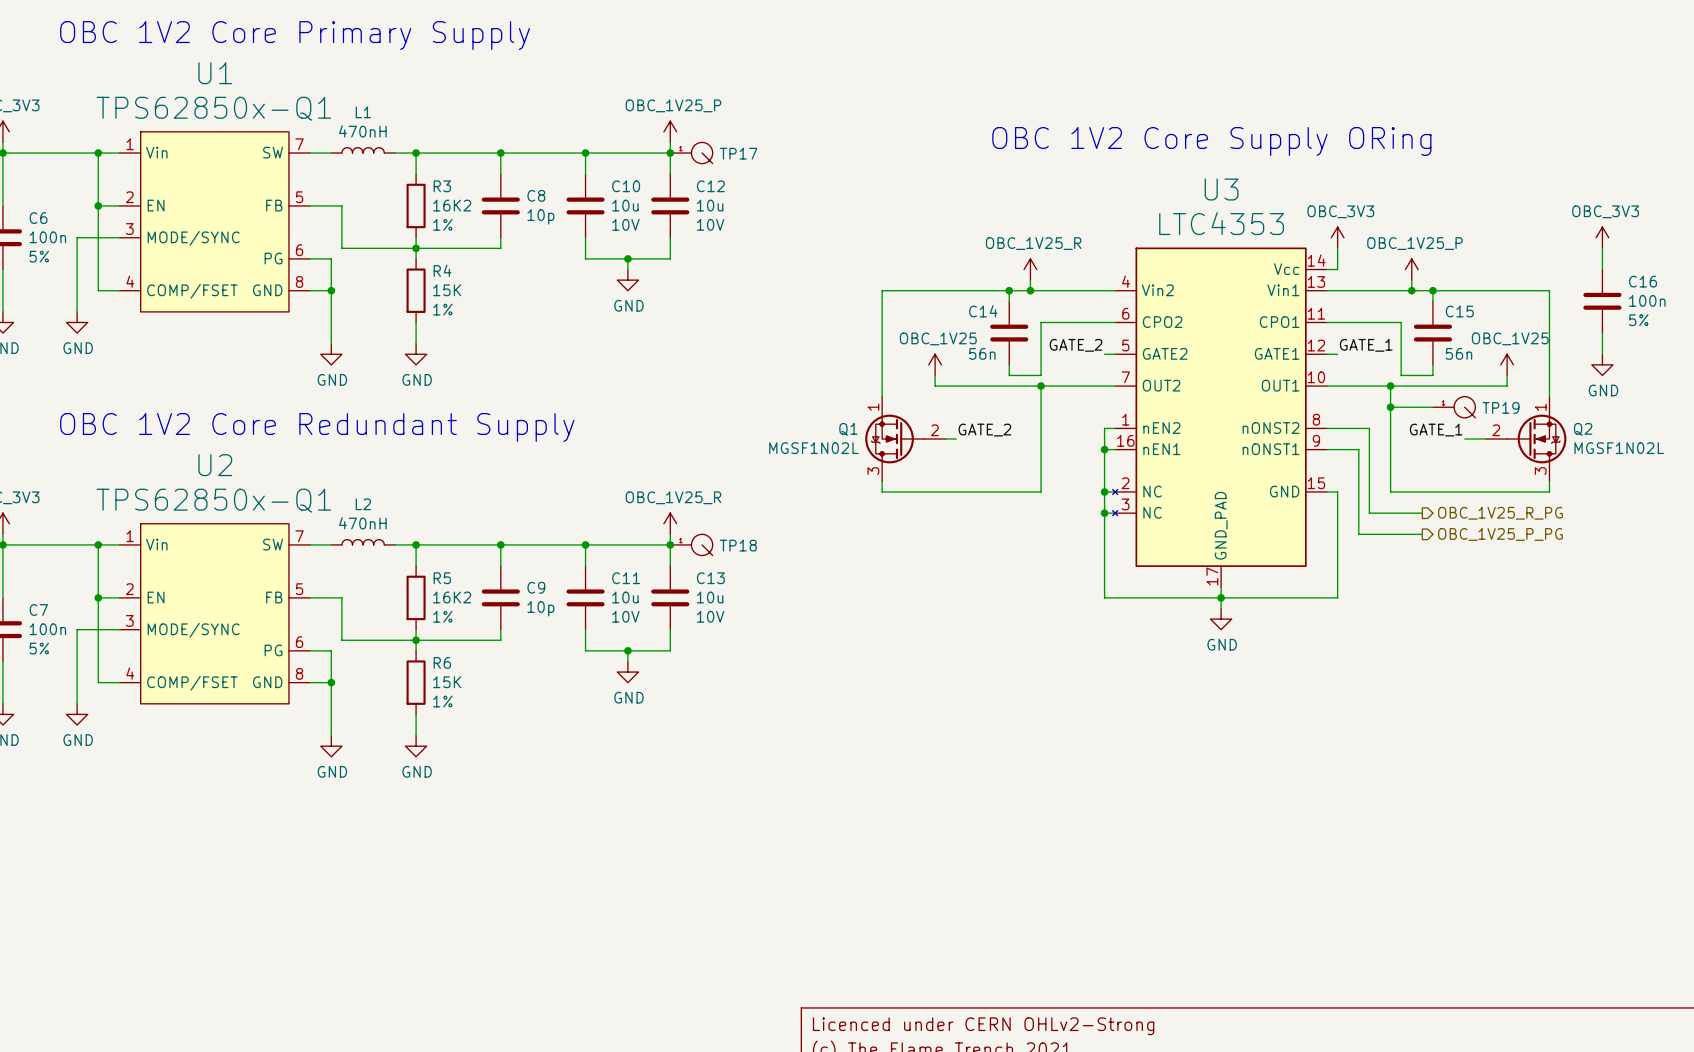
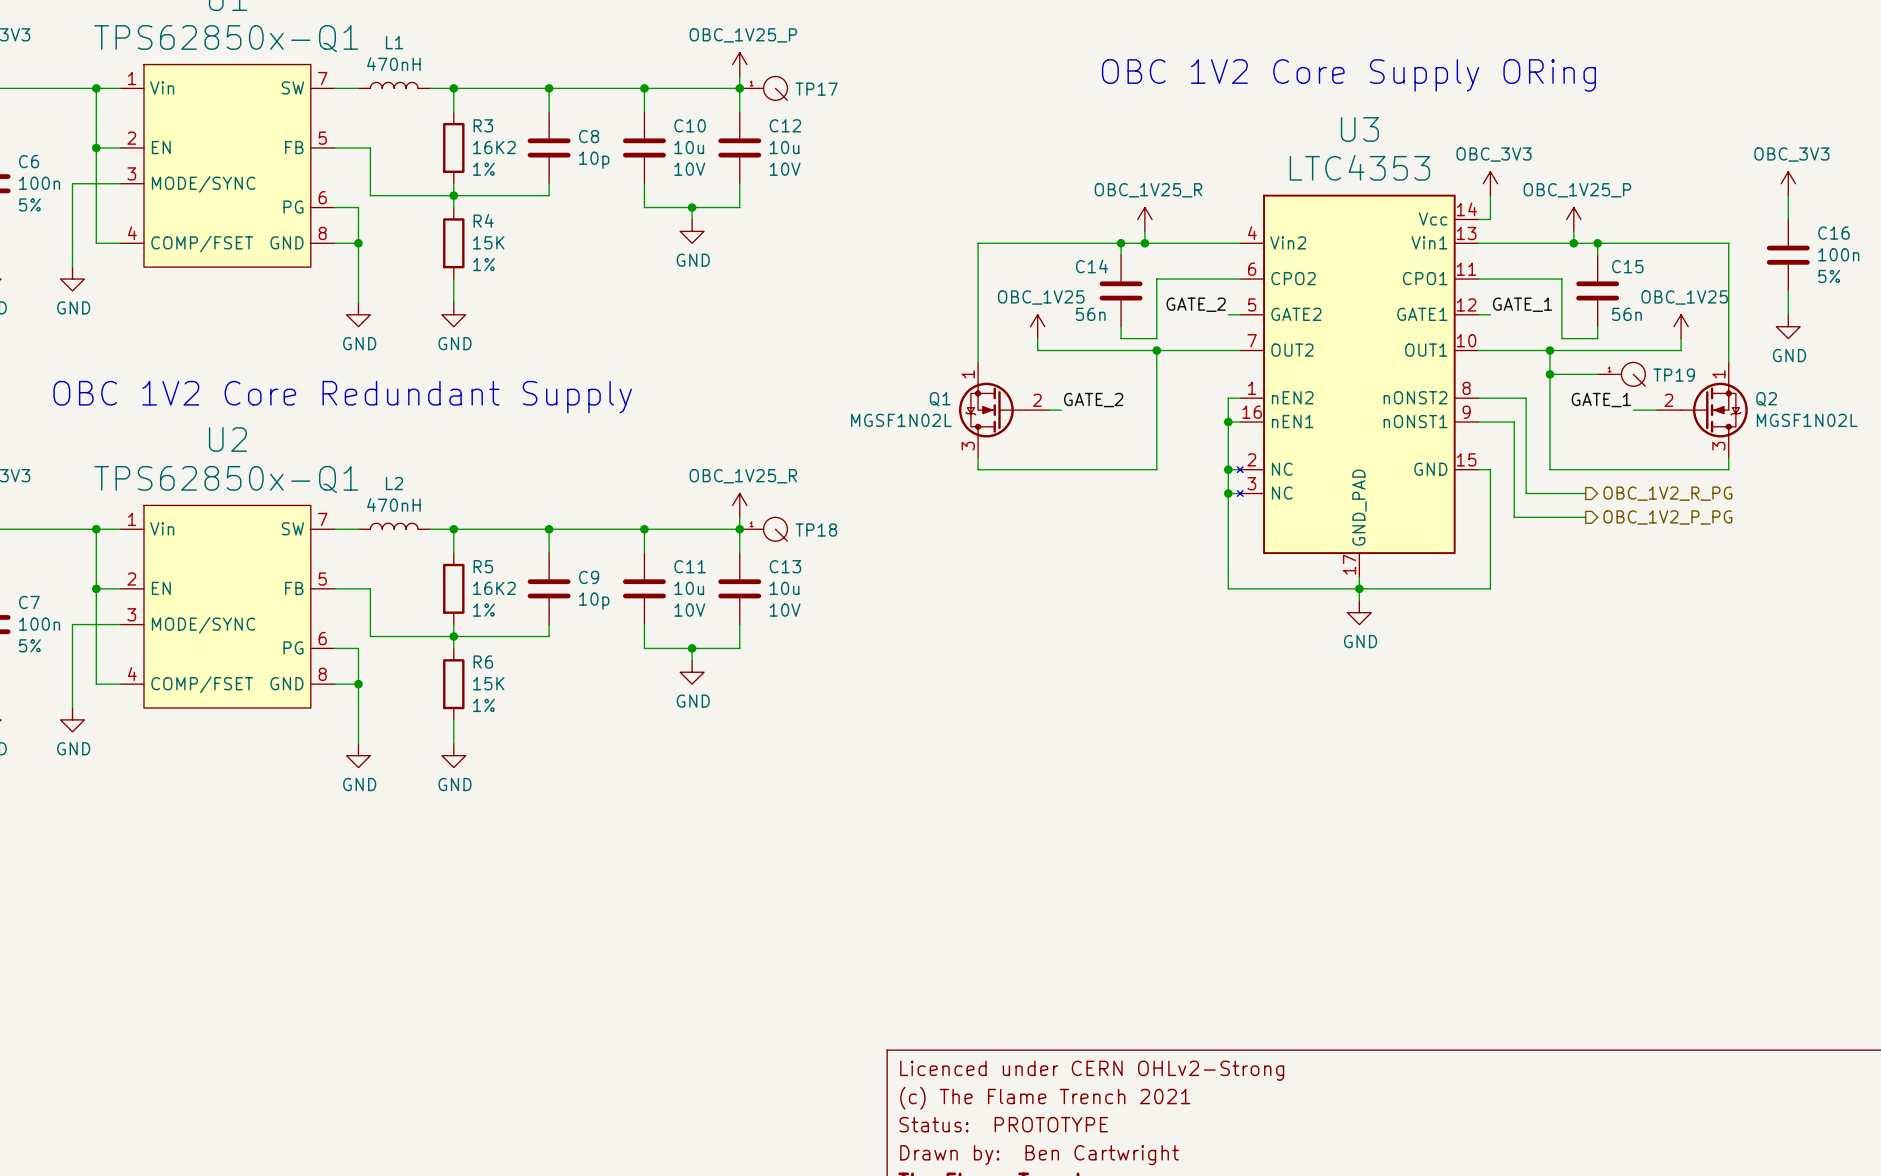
hierarchical label: OBC_1V25_R_PG (1500, 513) -> OBC_1V2_R_PG (1667, 493)
hierarchical label: OBC_1V25_P_PG (1500, 534) -> OBC_1V2_P_PG (1667, 517)

